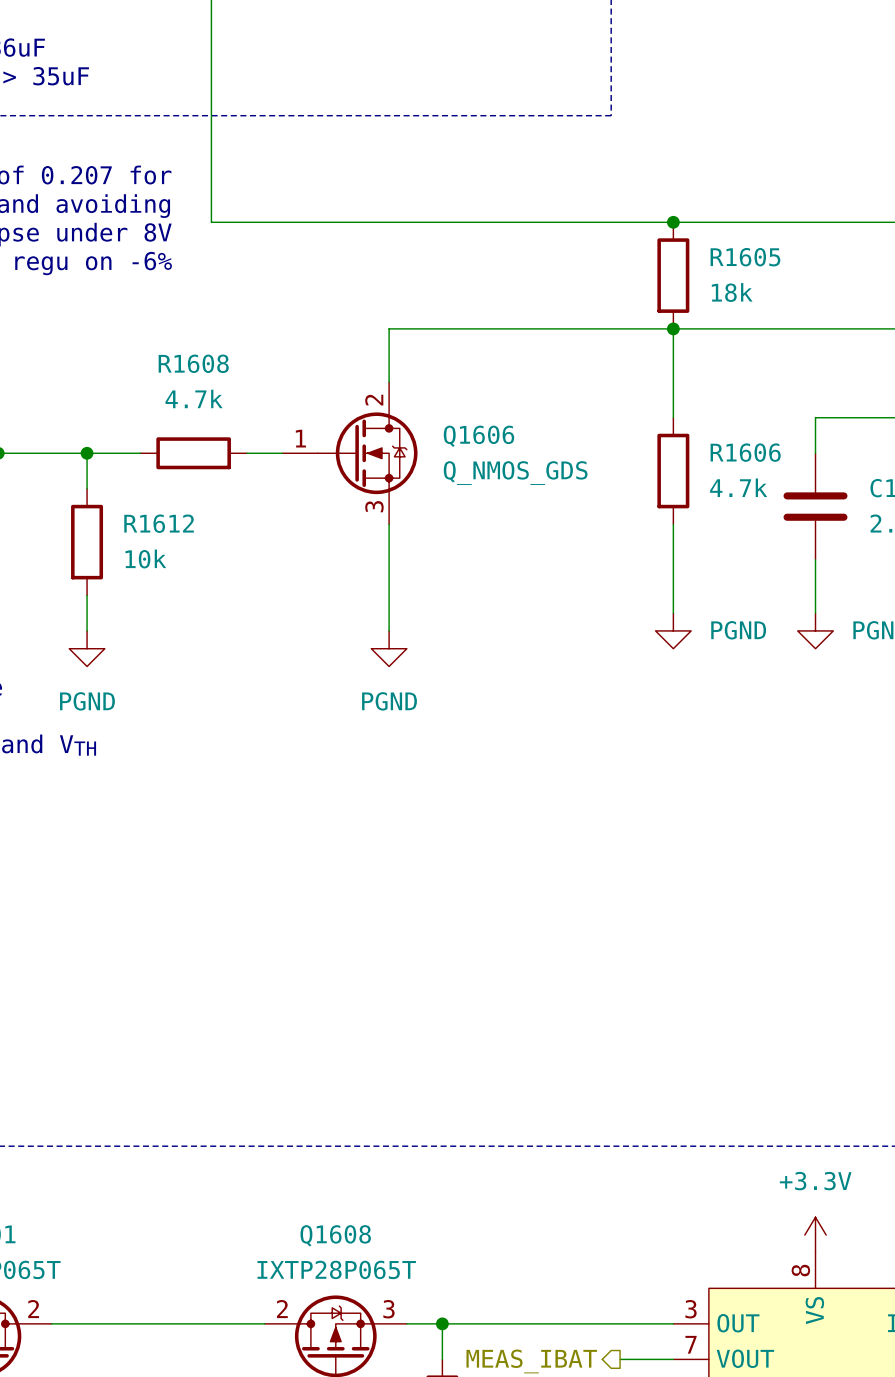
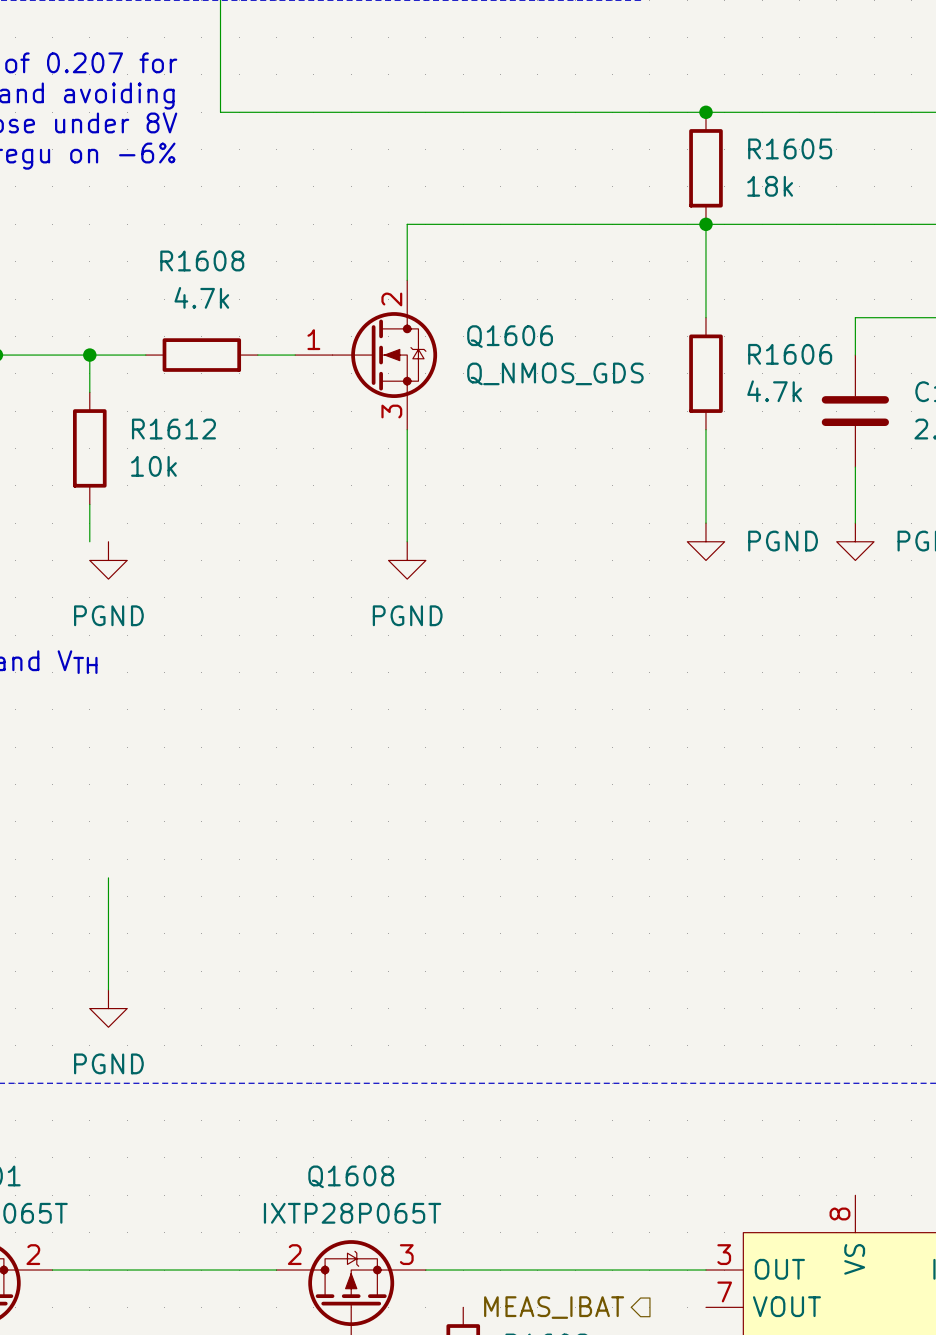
power symbol position: PGND (87, 648) -> PGND (108, 560)
wire: none -> (108, 877) (108, 989)
power symbol: none -> PGND (108, 1008)
power symbol: +3.3V (815, 1235) -> none
wire: (442, 1323) (442, 1359) -> none
junction: (442, 1323) -> none
wire: (620, 1359) (673, 1359) -> none

